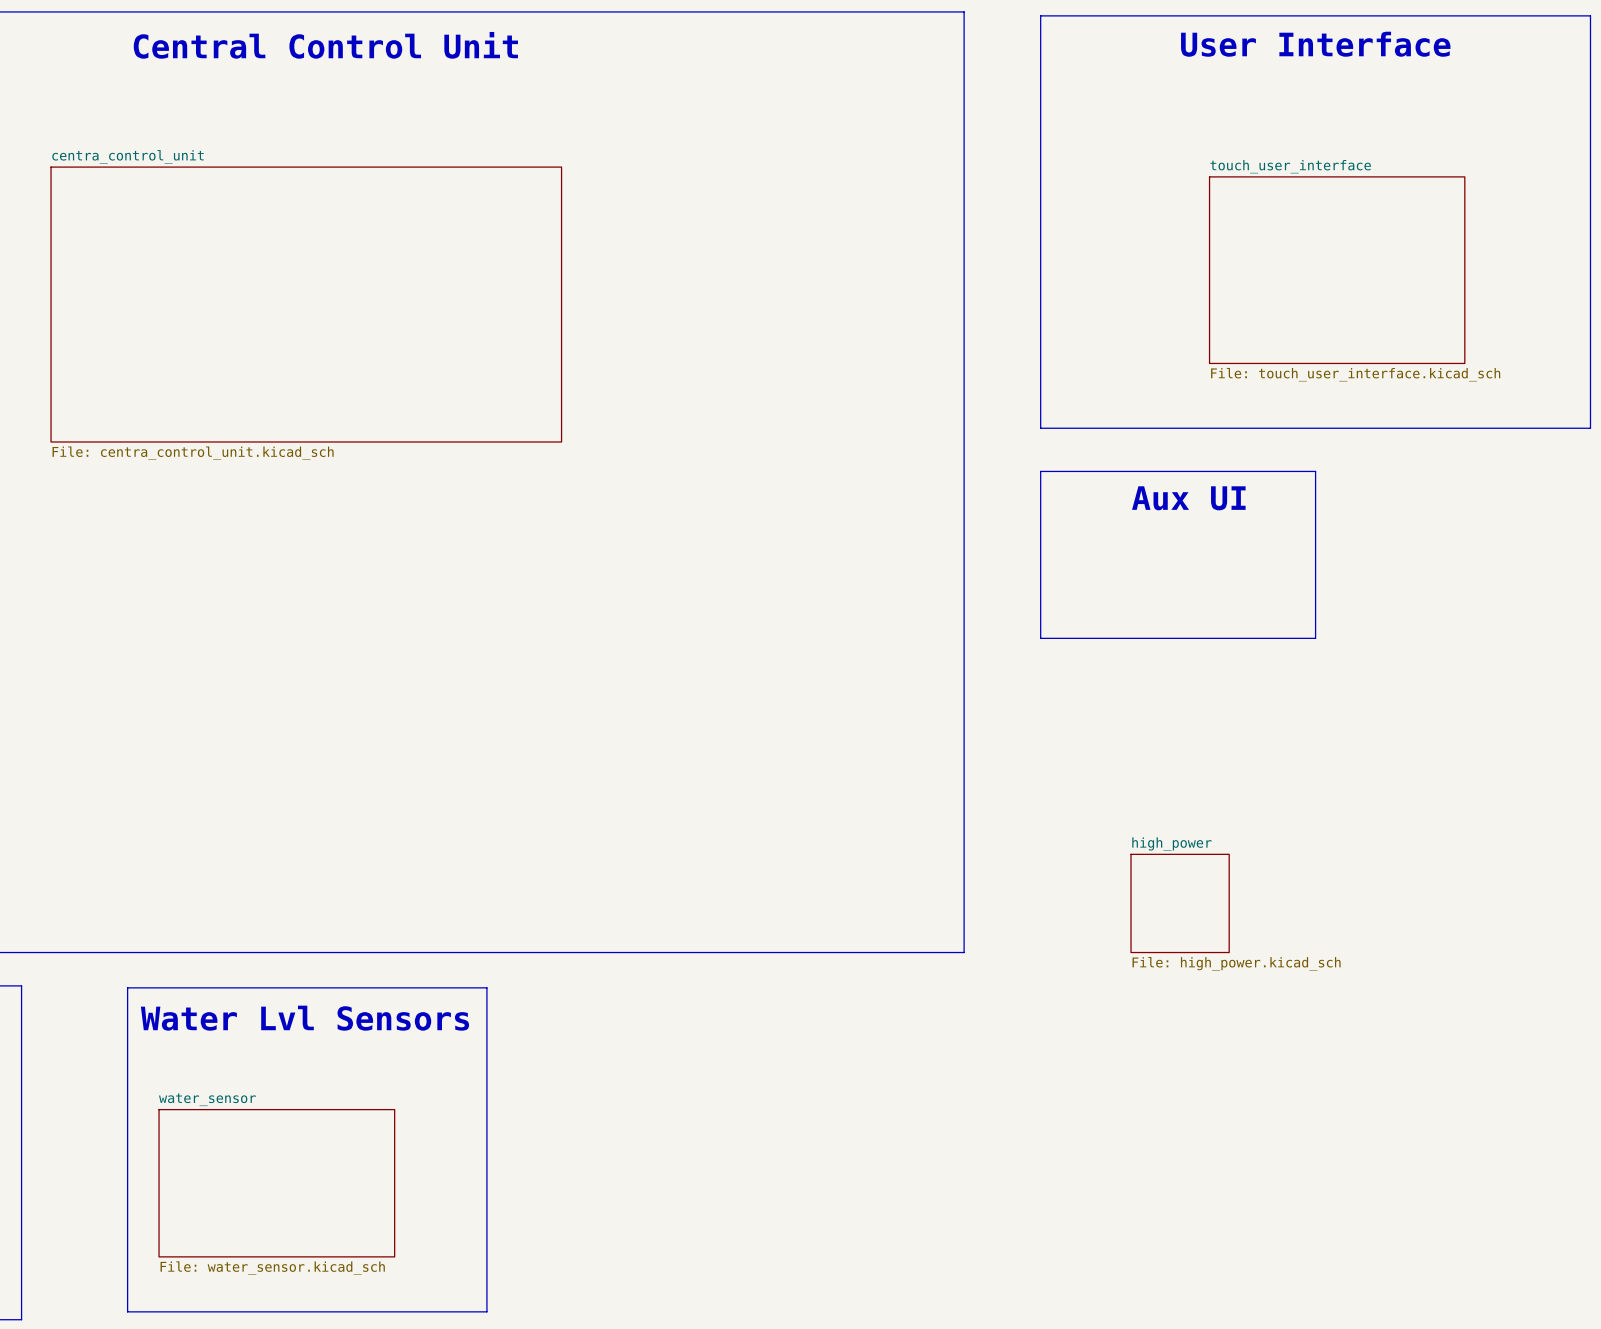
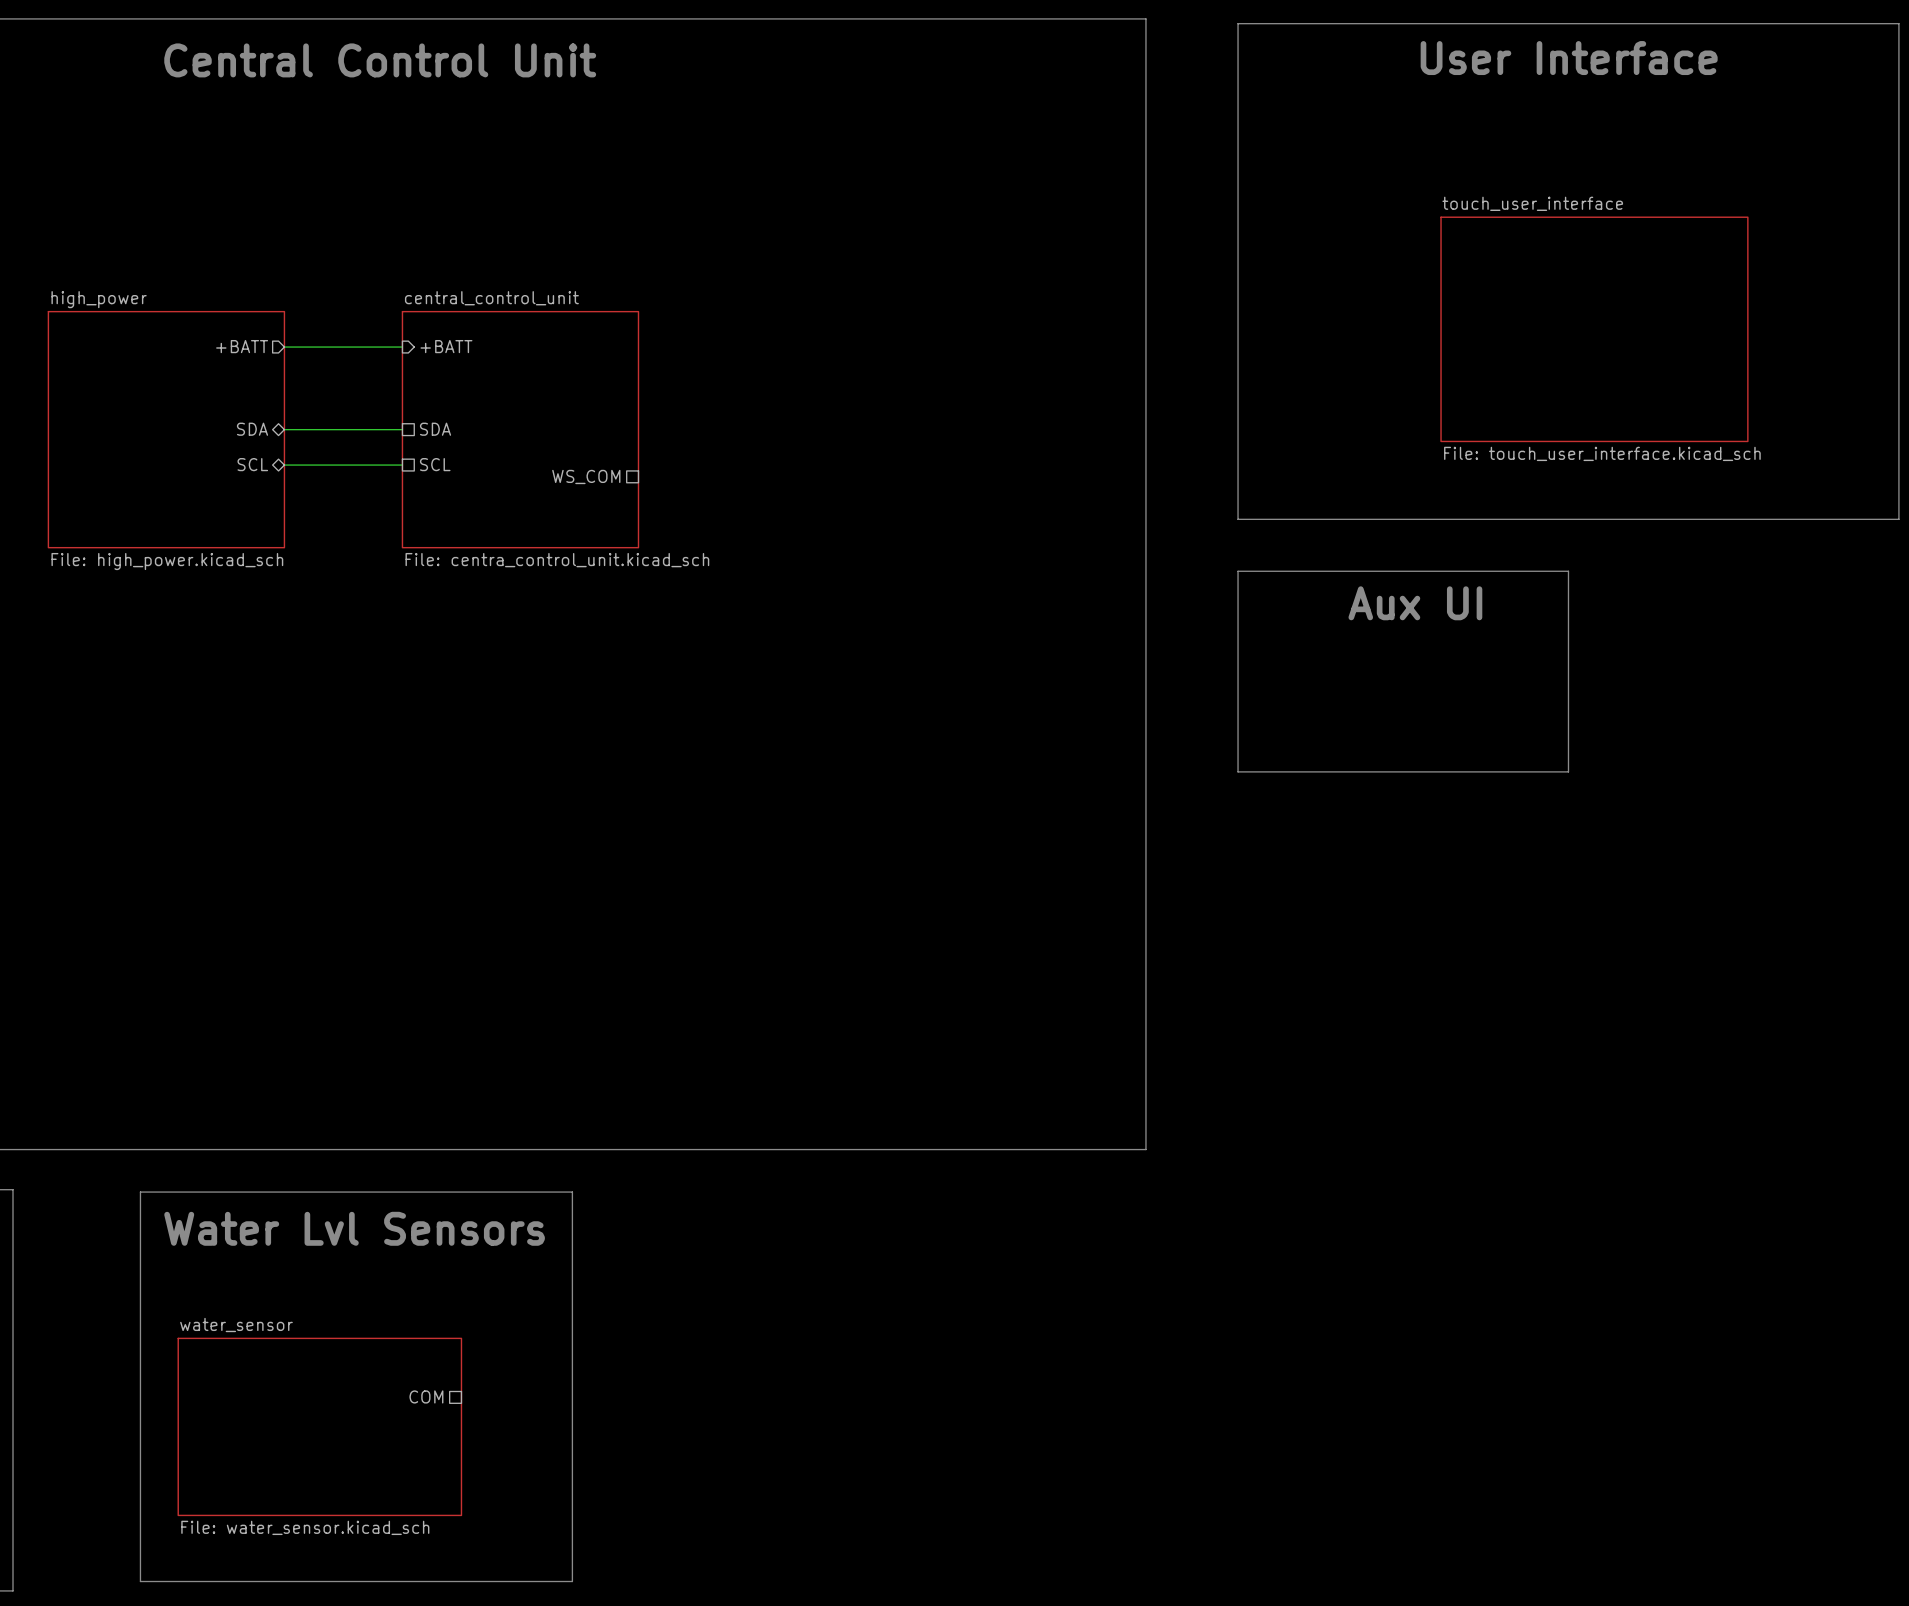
sheet pin: none -> +BATT (242, 346)
wire: none -> (284, 347) (402, 347)
sheet pin: none -> +BATT (446, 346)
sheet centra_control_unit: File: centra_control_unit.kicad_sch (306, 304) -> none
sheet high_power: none -> File: high_power.kicad_sch (166, 429)
sheet pin: none -> SDA (252, 429)
wire: none -> (284, 429) (402, 429)
sheet pin: none -> SDA (435, 429)
sheet central_control_unit: none -> File: centra_control_unit.kicad_sch (520, 429)
sheet pin: none -> SCL (252, 464)
sheet pin: none -> SCL (435, 464)
wire: none -> (284, 465) (402, 465)
sheet pin: none -> WS_COM (586, 476)
sheet high_power: File: high_power.kicad_sch (1180, 903) -> none
sheet pin: none -> COM (426, 1396)

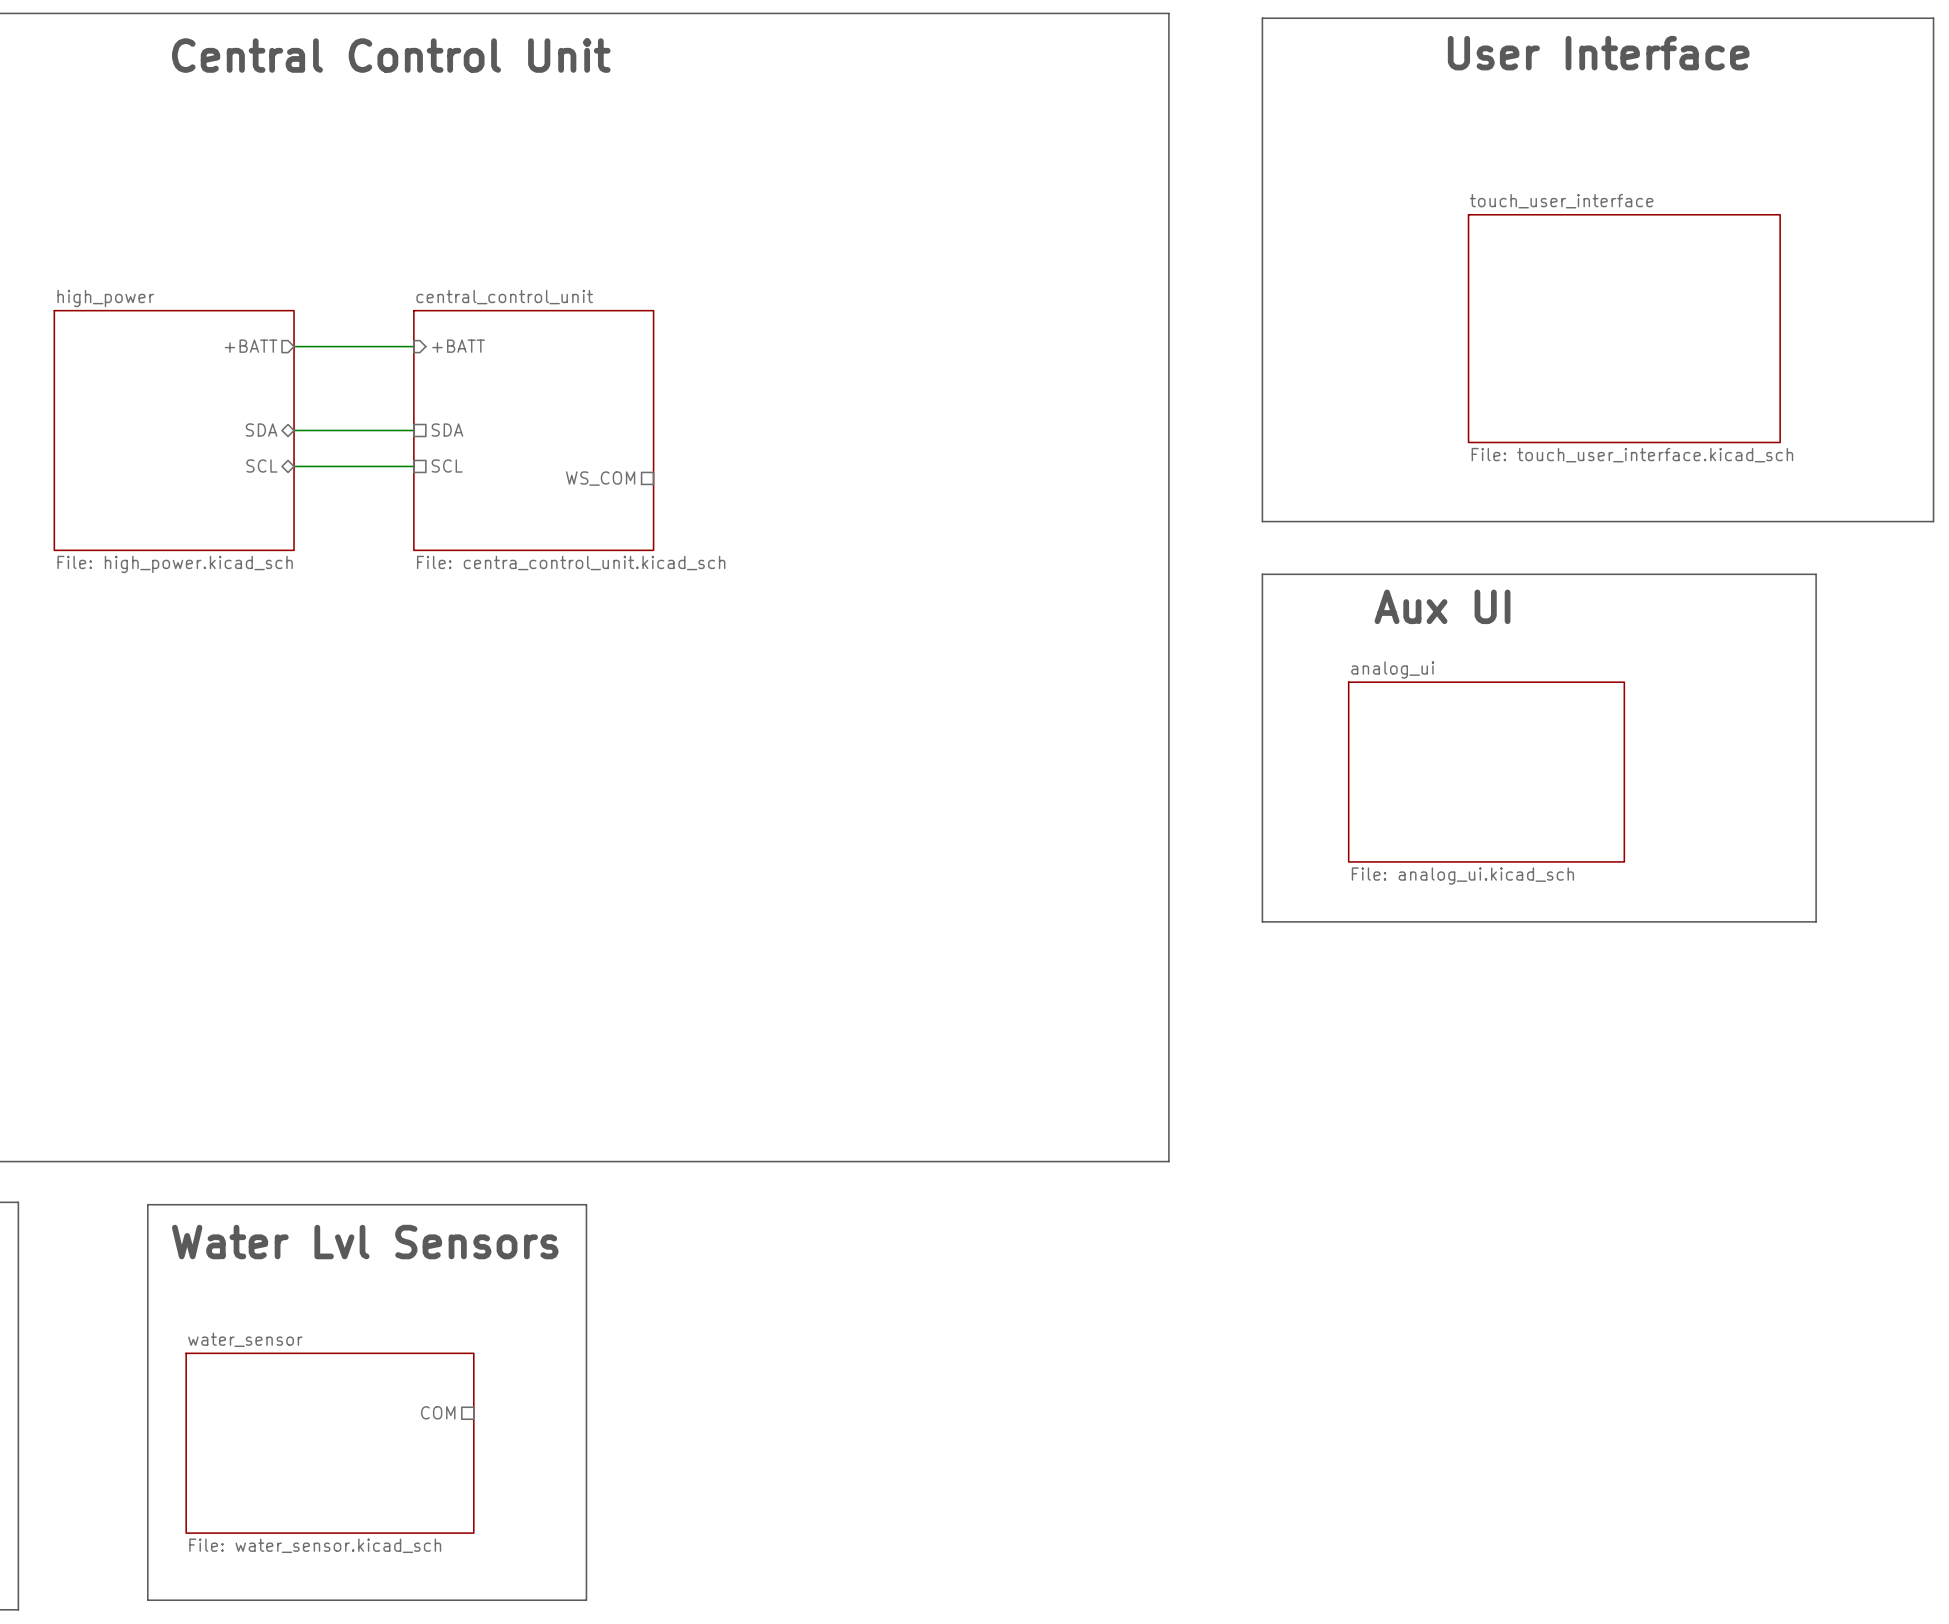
line: (1568, 571) (1568, 771) (1238, 771) -> (1597, 574) (1816, 574) (1816, 921) (1262, 921) (1262, 778)
sheet analog_ui: none -> File: analog_ui.kicad_sch (1486, 772)

